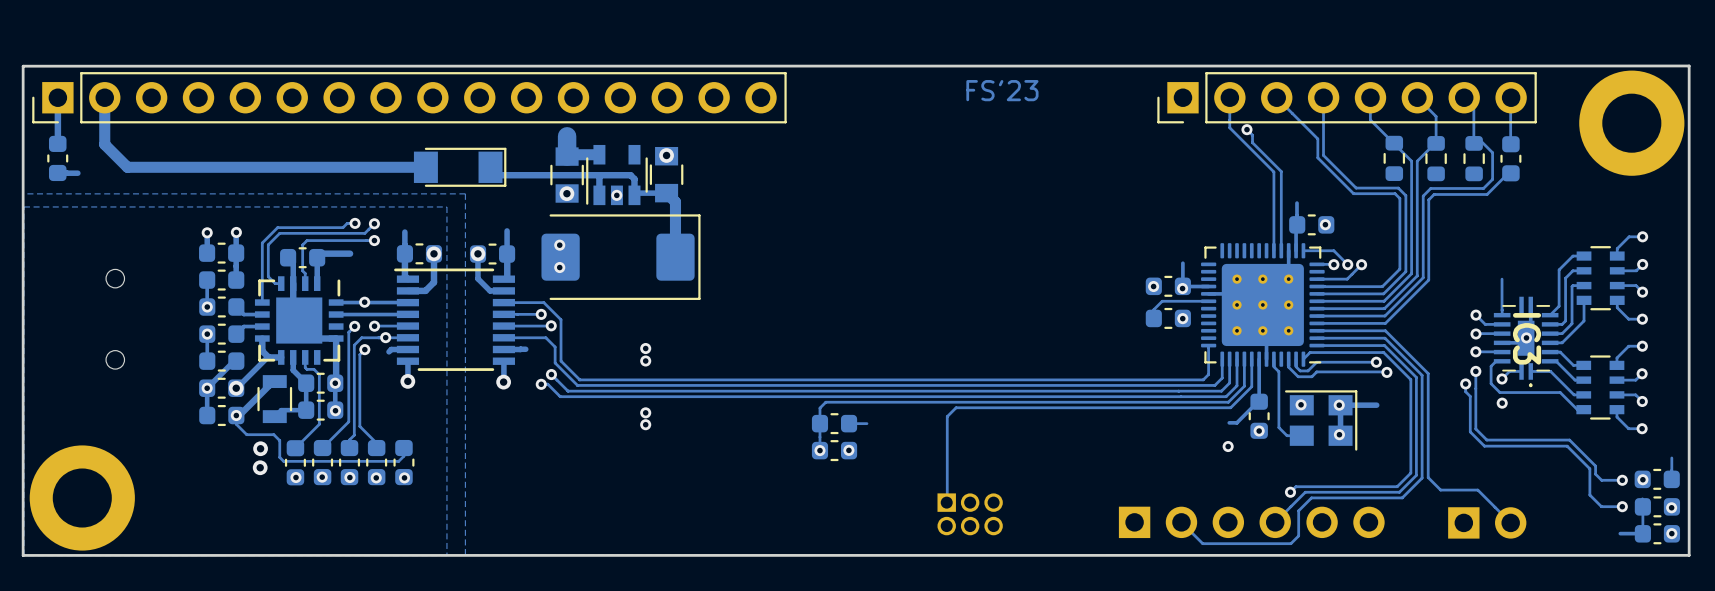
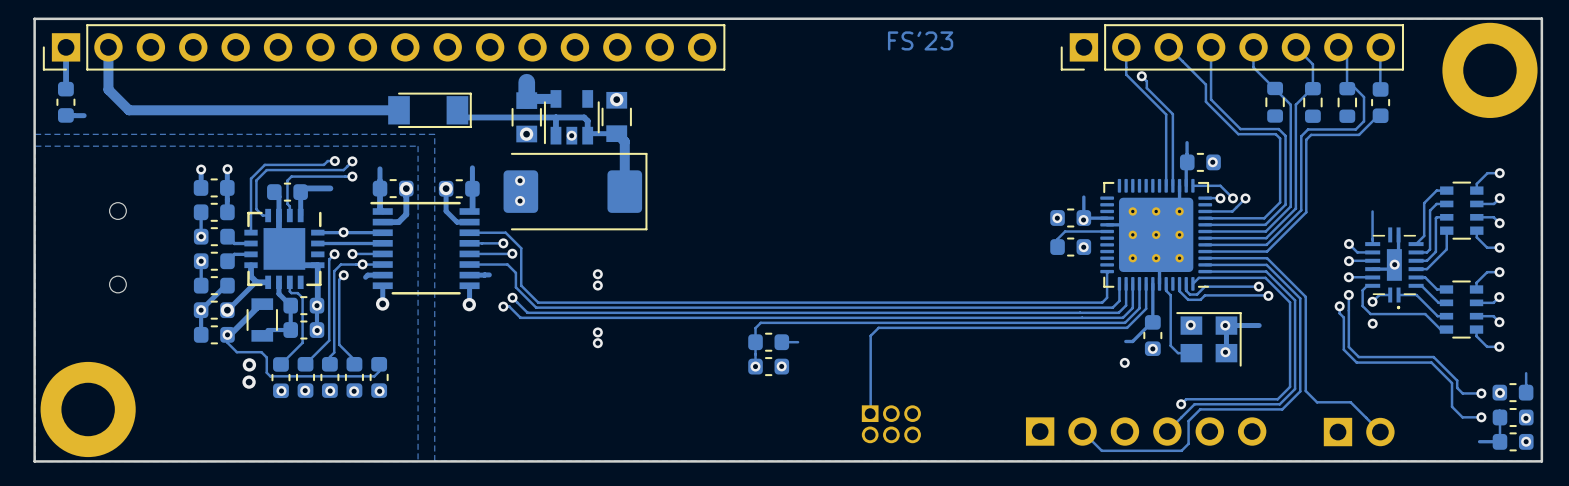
IC3 name: IC3 (1527, 338) -> none

